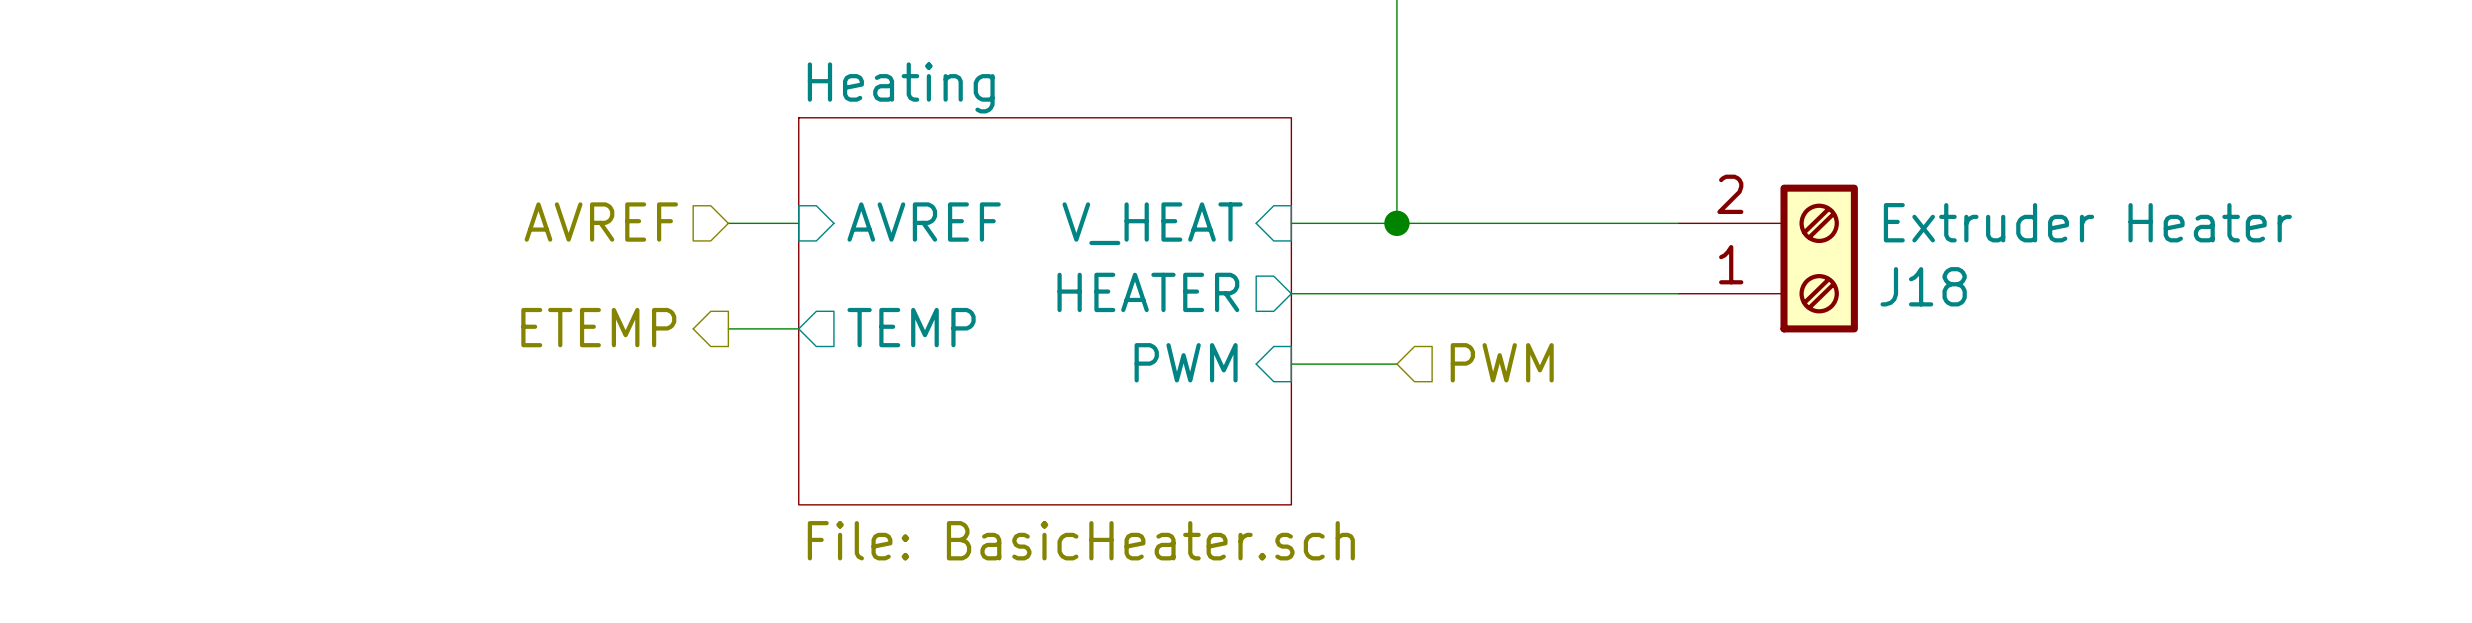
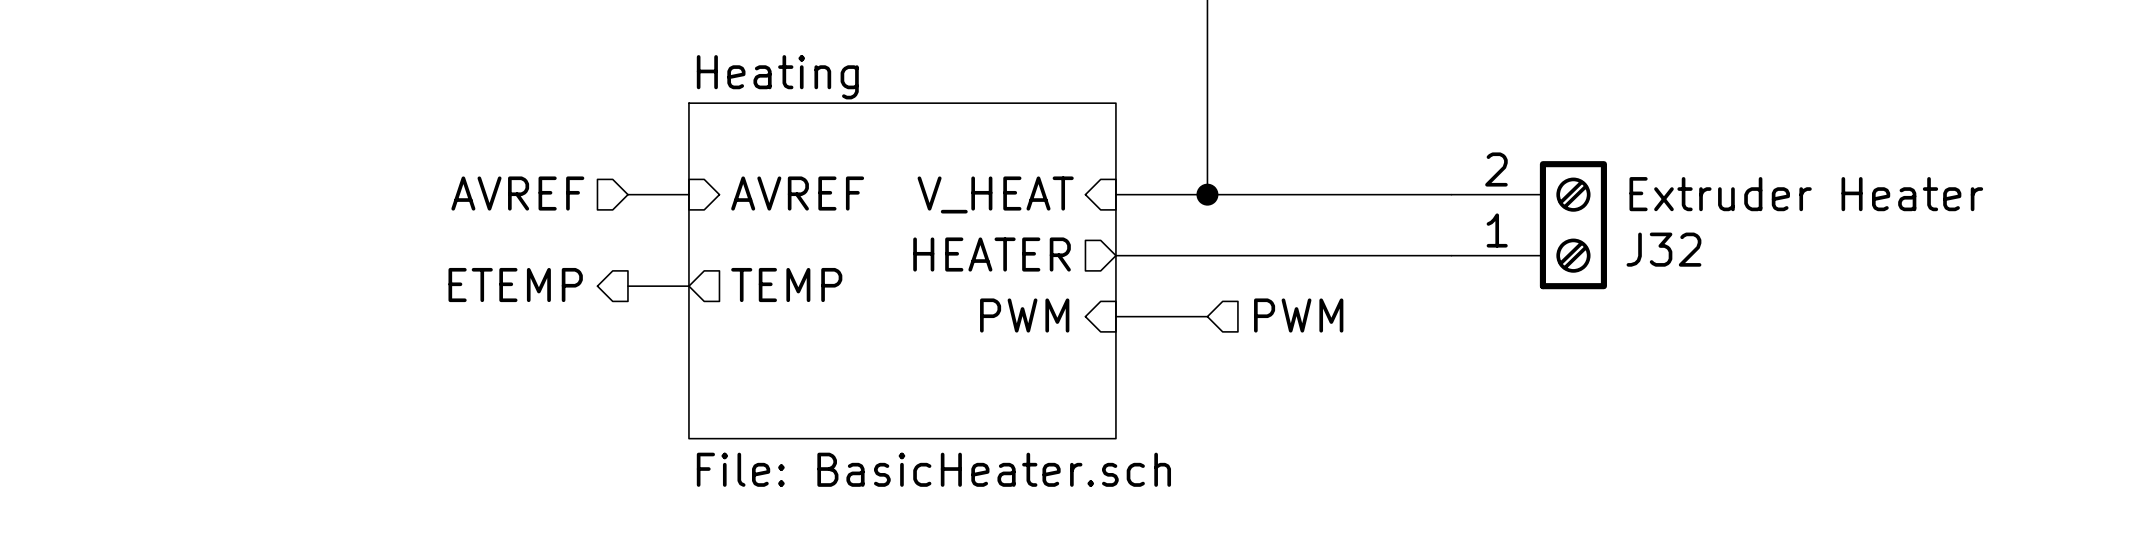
J18 name: J18 (1923, 286) -> J32 (1663, 249)

